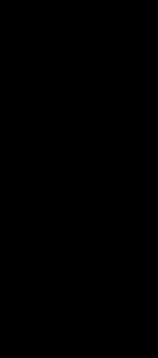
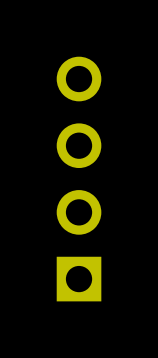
part: none -> (79, 179)

